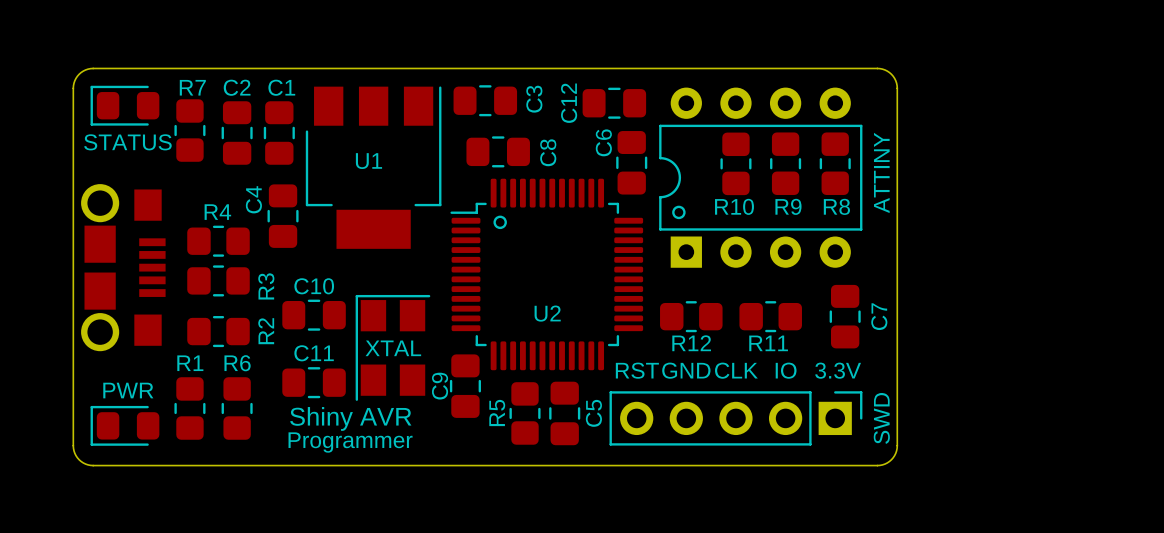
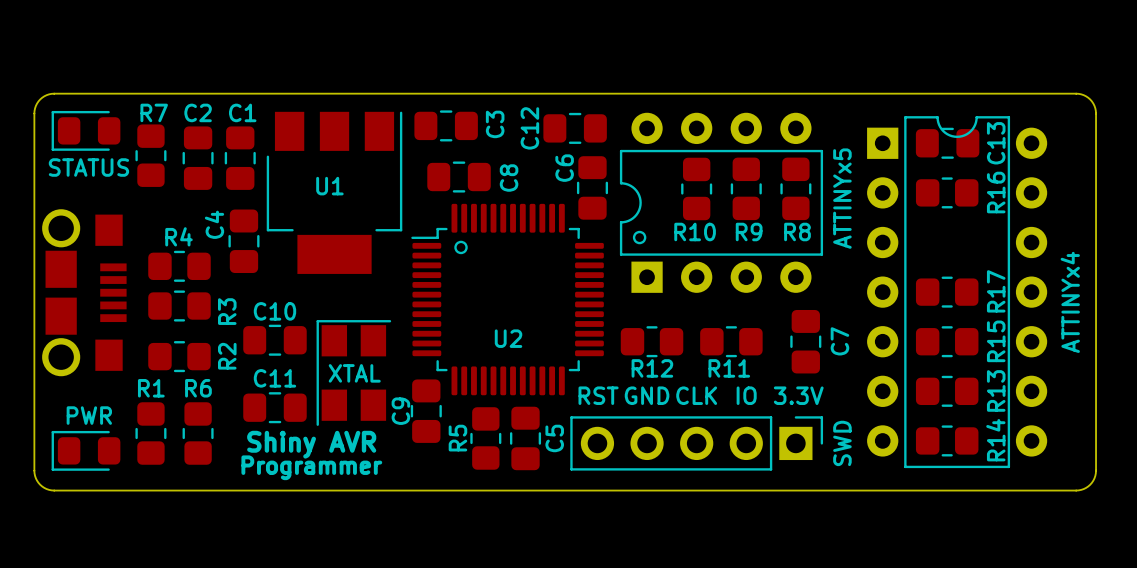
board edge: (877, 68) (885, 69) (891, 74) (895, 80) (897, 88) (897, 445) (895, 453) (891, 459) (885, 464) (877, 465) -> (838, 93) (1078, 93) (1086, 96) (1091, 101) (1096, 113) (1096, 470) (1091, 482) (1086, 487) (1076, 490) (838, 490)
C13: none -> (947, 143)
R16: none -> (947, 192)
text: ATTINY (881, 172) -> ATTINYx5 (842, 198)
R17: none -> (947, 292)
part: none -> (957, 292)
text: none -> ATTINYx4 (1070, 302)
R15: none -> (947, 341)
R13: none -> (947, 391)
R14: none -> (947, 440)

